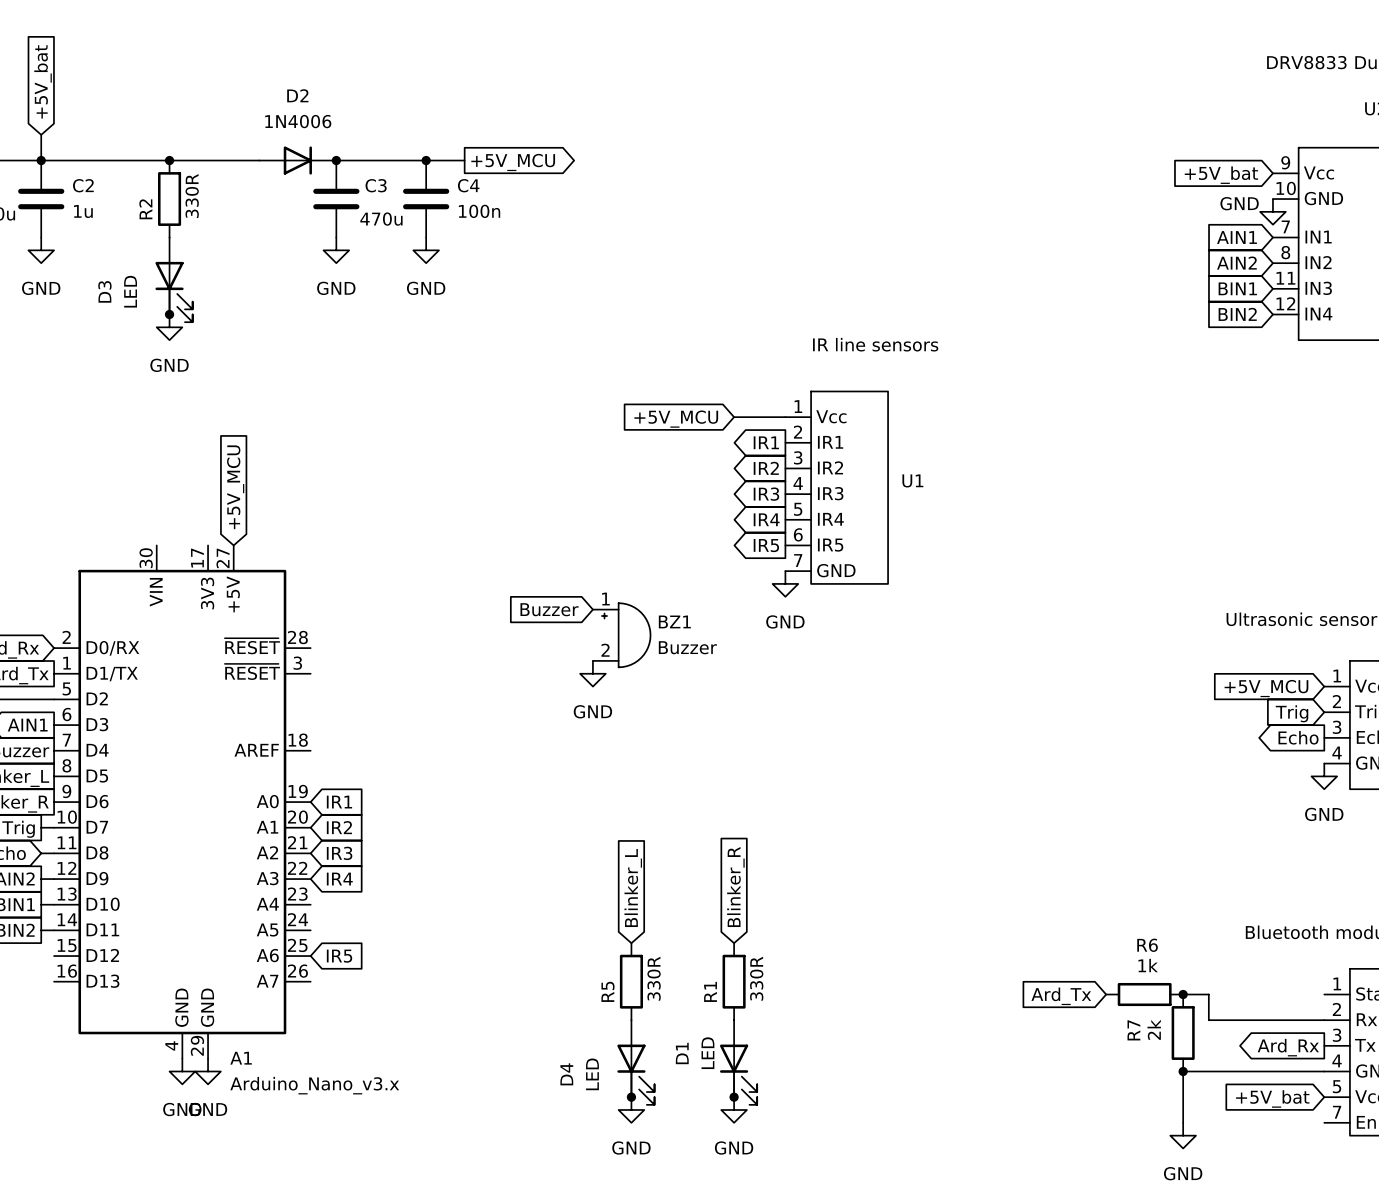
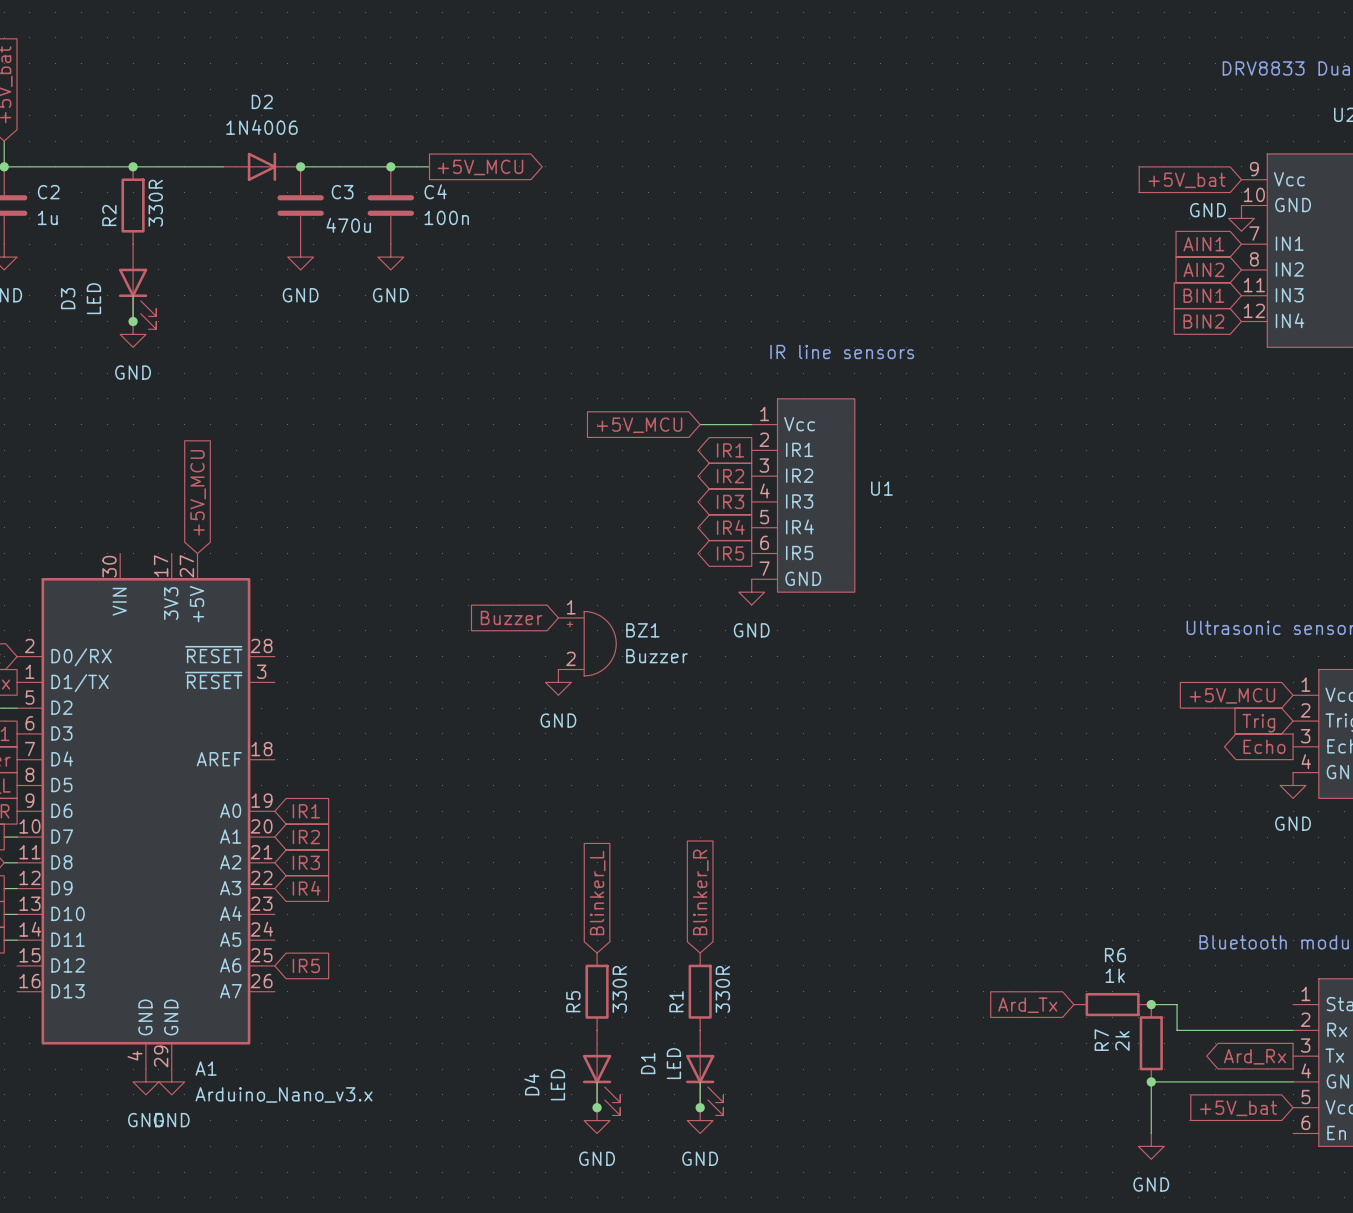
part pin number: 7 (1337, 1112) -> 6 (1305, 1122)

